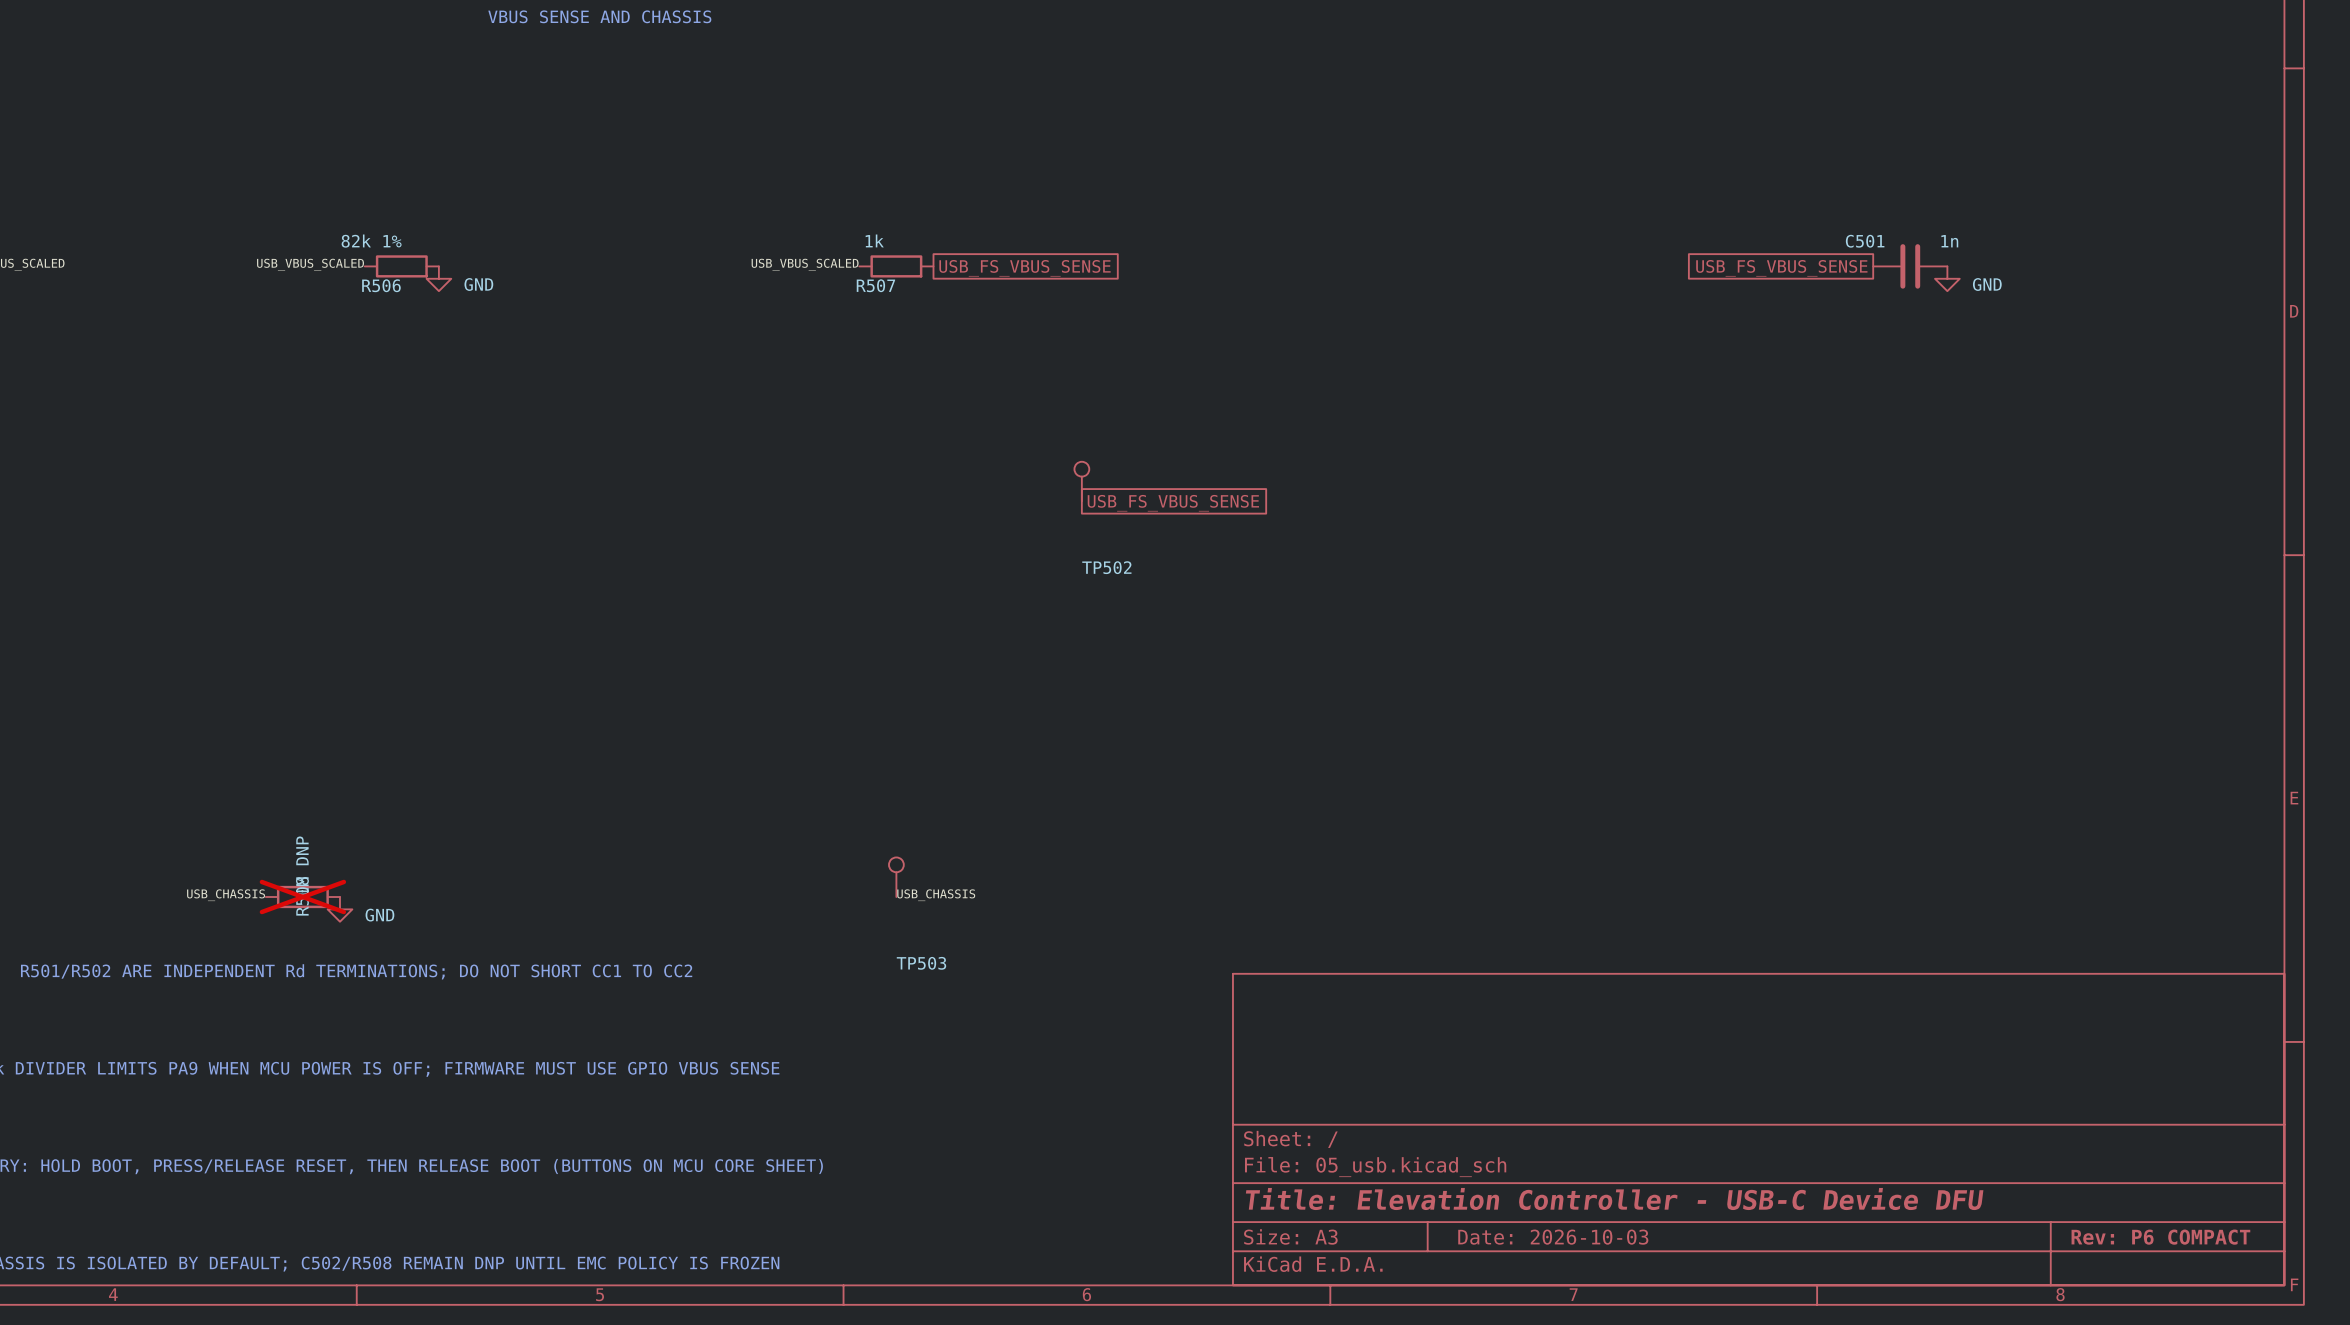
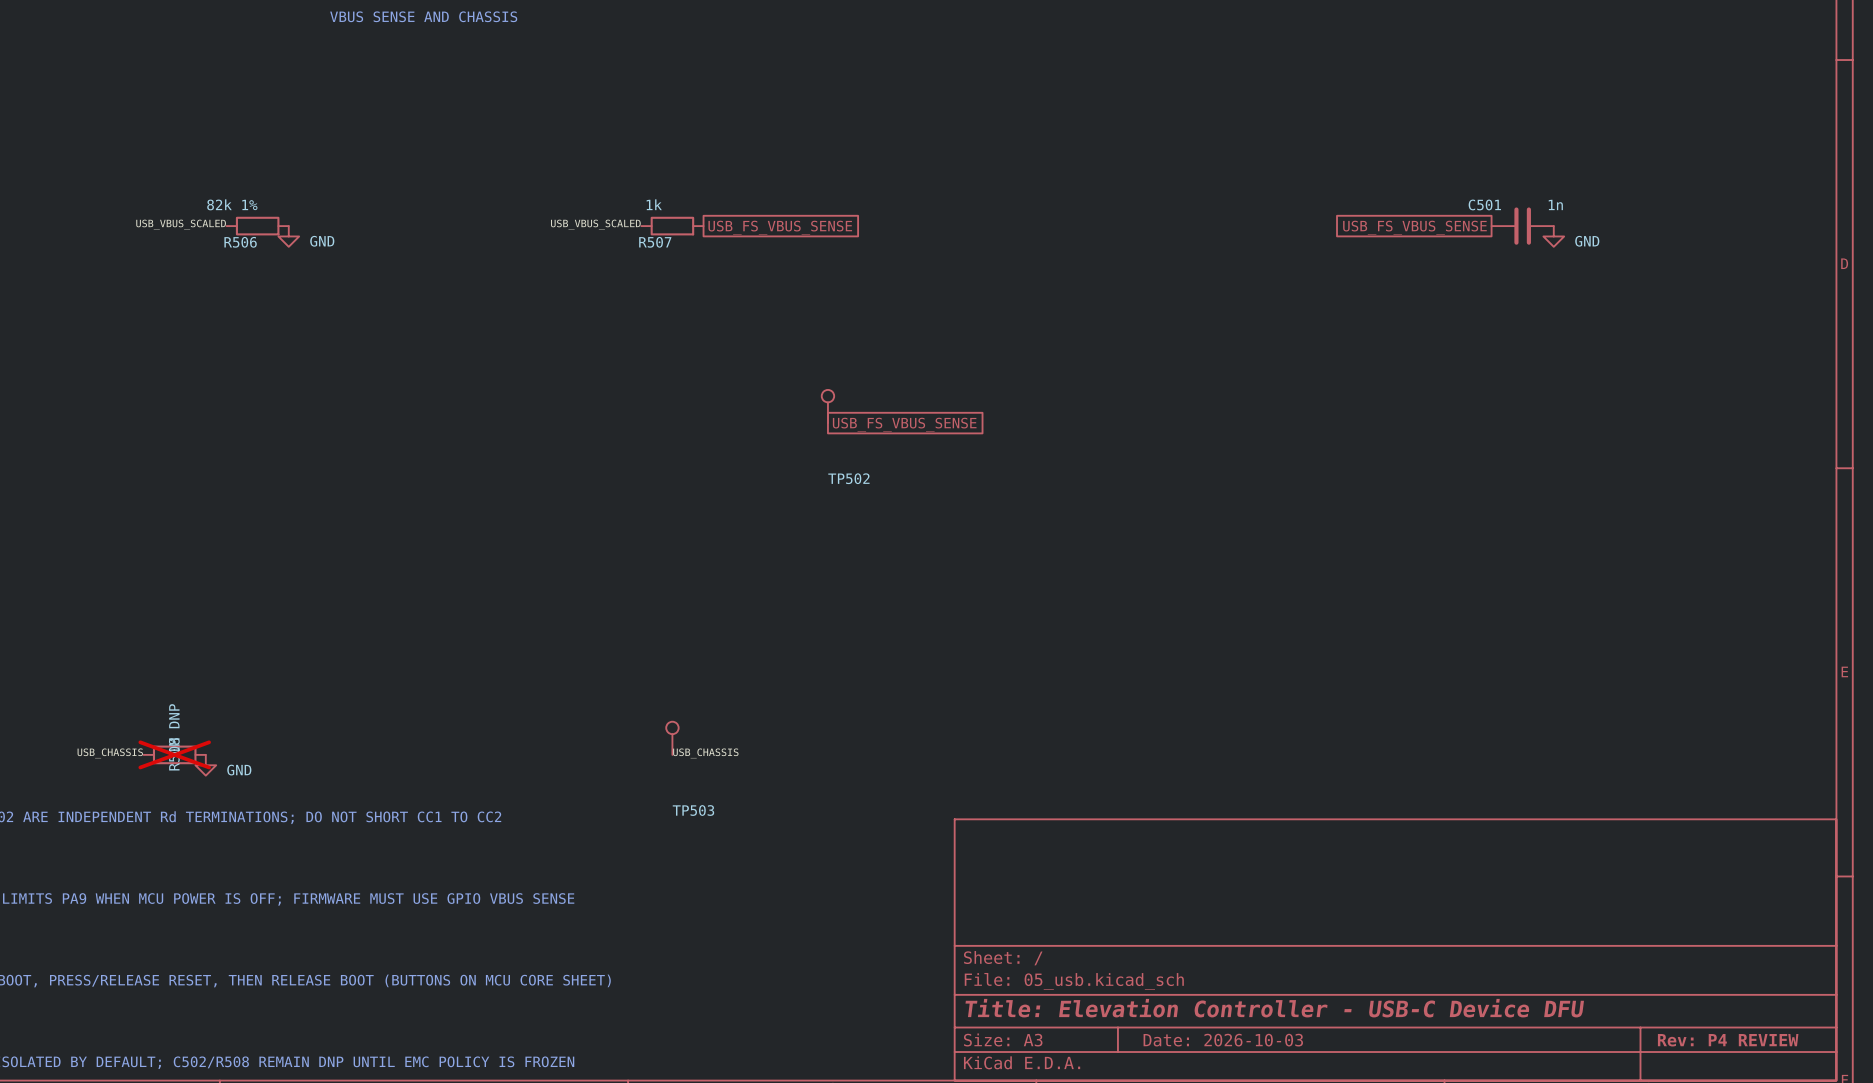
title block: Rev: P6 COMPACT (2160, 1237) -> Rev: P4 REVIEW (1728, 1040)

